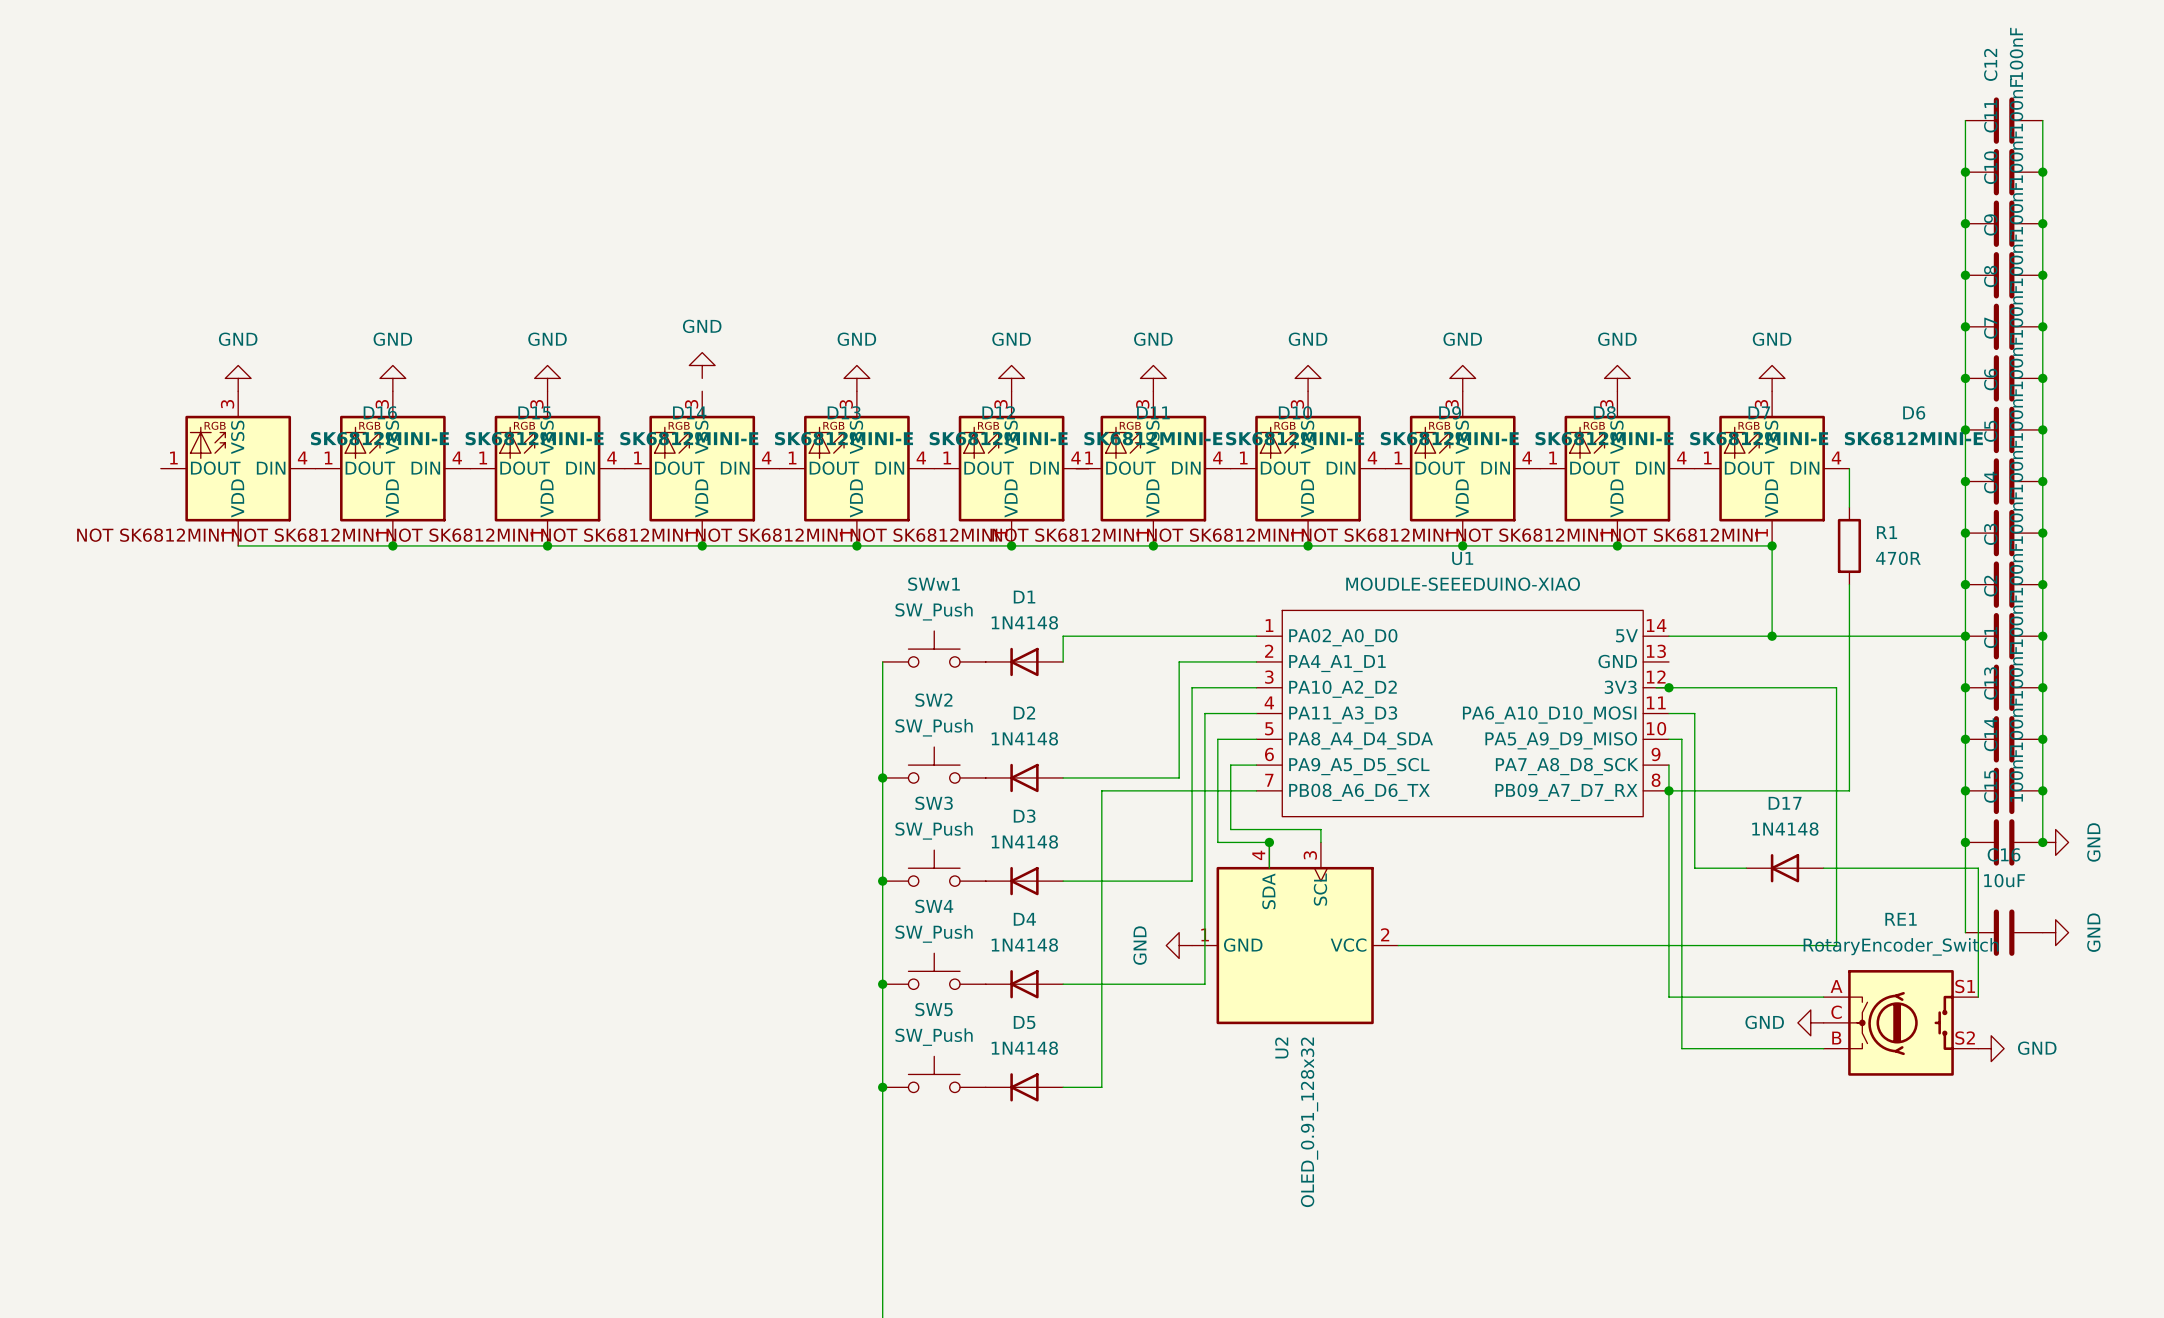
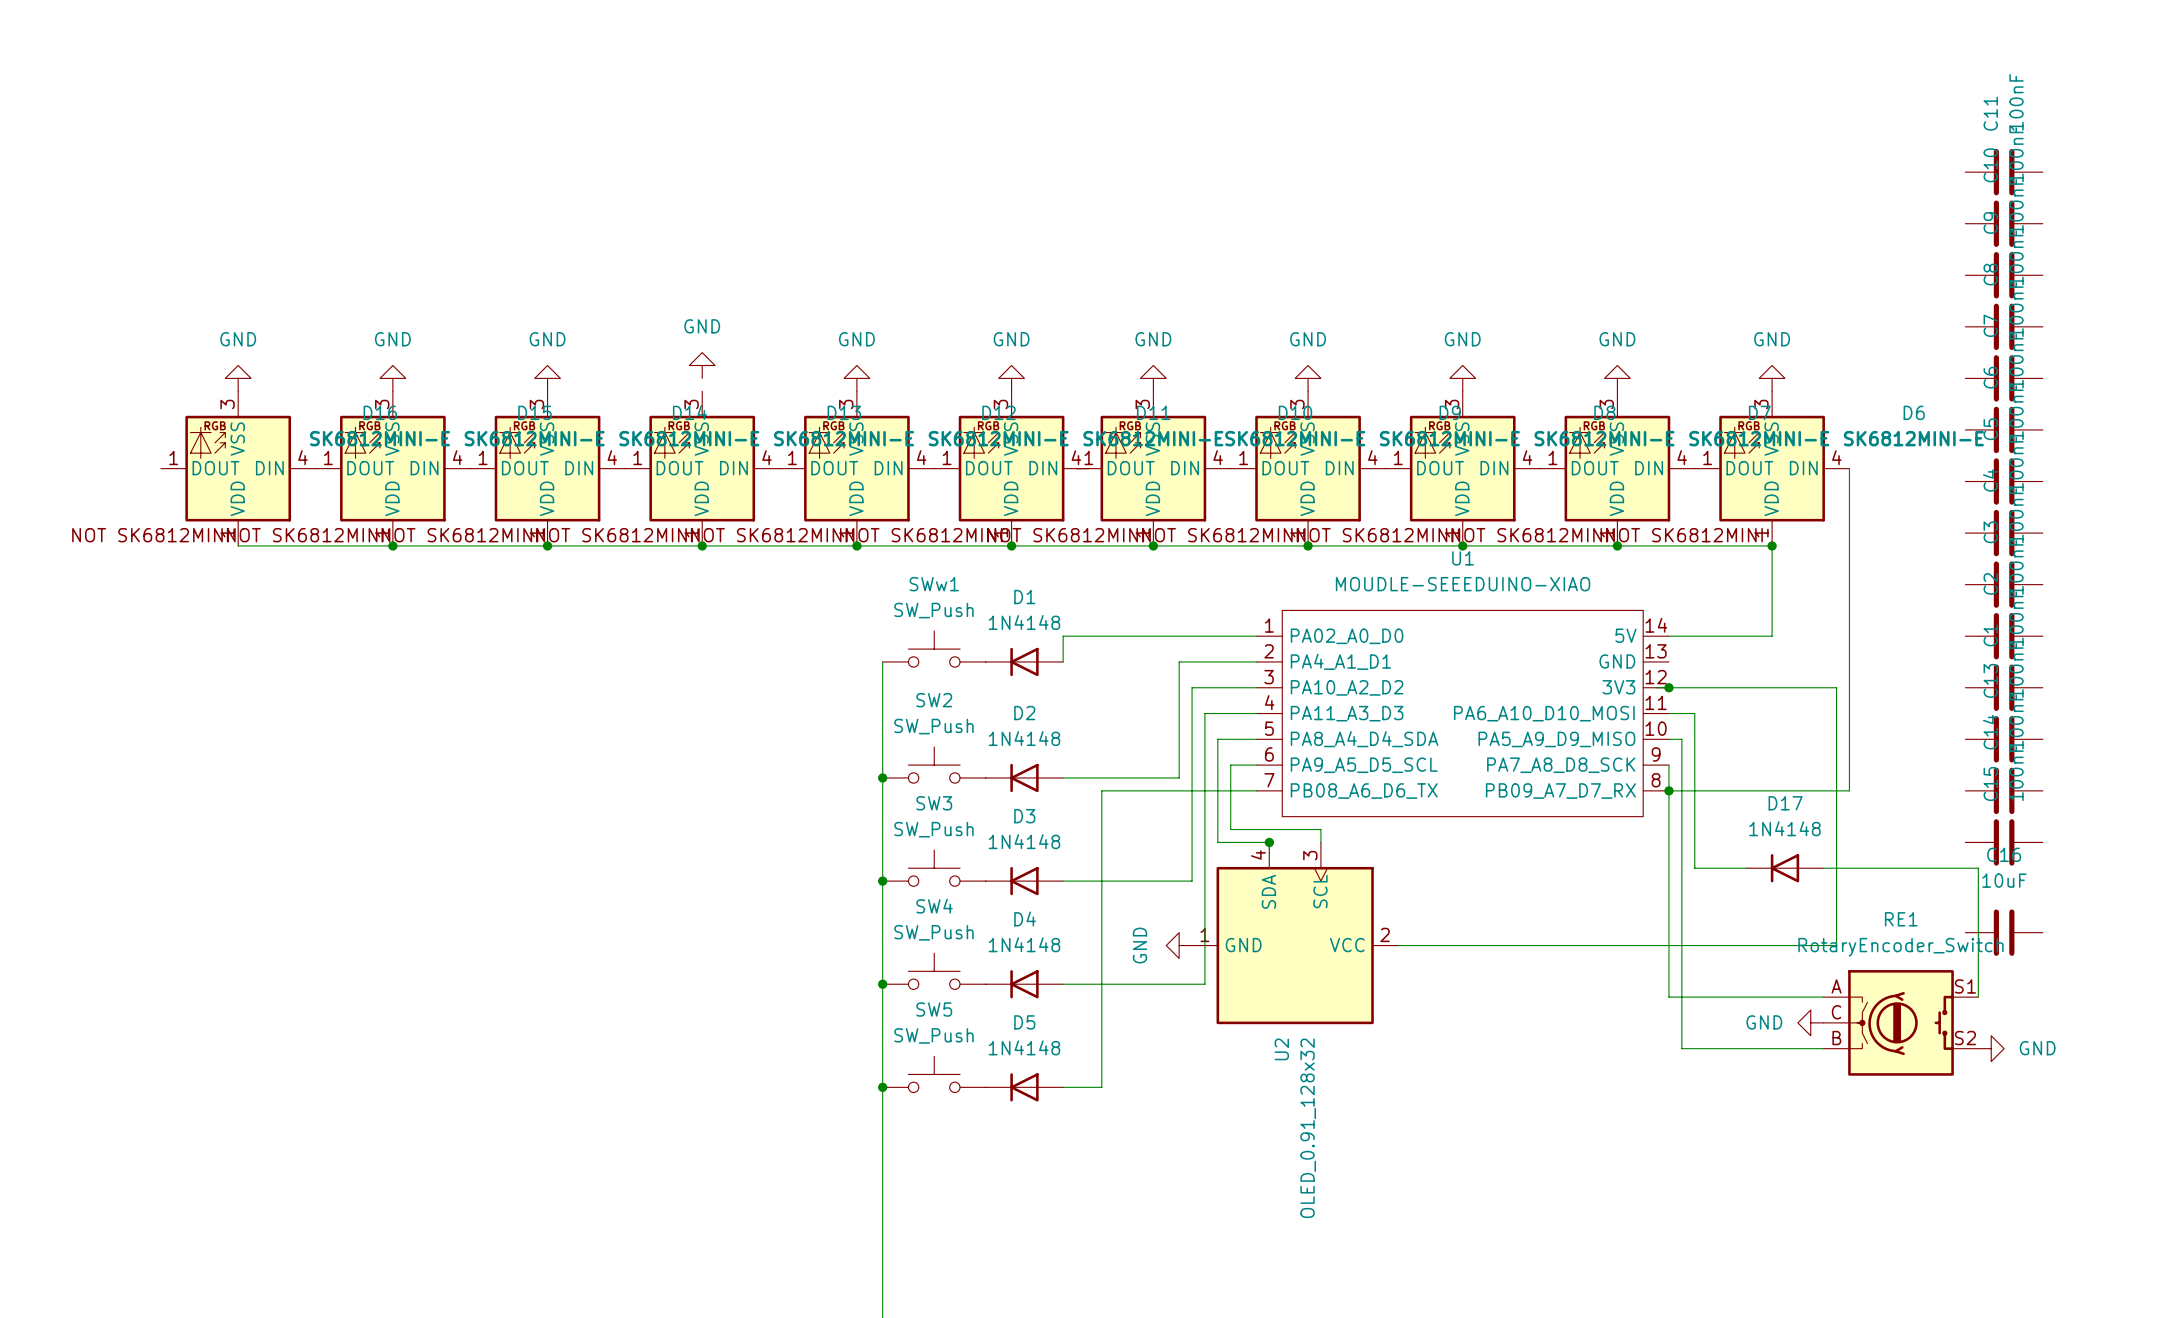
wire: (1965, 120) (1965, 932) -> none
C12: 100nF (2004, 120) -> none
wire: (2042, 120) (2042, 842) -> none
junction: (1965, 172) -> none
junction: (2042, 172) -> none
junction: (1965, 223) -> none
junction: (2042, 223) -> none
junction: (1965, 275) -> none
junction: (2042, 275) -> none
junction: (1965, 326) -> none
junction: (2042, 326) -> none
junction: (1965, 378) -> none
junction: (2042, 378) -> none
junction: (1965, 429) -> none
junction: (2042, 429) -> none
junction: (1965, 481) -> none
junction: (2042, 481) -> none
wire: none -> (1849, 507) (1849, 584)
junction: (1965, 533) -> none
junction: (2042, 533) -> none
R1: 470R (1849, 545) -> none
junction: (1965, 584) -> none
junction: (2042, 584) -> none
wire: (1772, 636) (1965, 636) -> none
junction: (1772, 636) -> none
junction: (1965, 636) -> none
junction: (2042, 636) -> none
junction: (1965, 687) -> none
junction: (2042, 687) -> none
junction: (1965, 739) -> none
junction: (2042, 739) -> none
junction: (1965, 790) -> none
junction: (2042, 790) -> none
junction: (1965, 842) -> none
junction: (2042, 842) -> none
power symbol: GND (2055, 842) -> none
power symbol: GND (2055, 932) -> none

